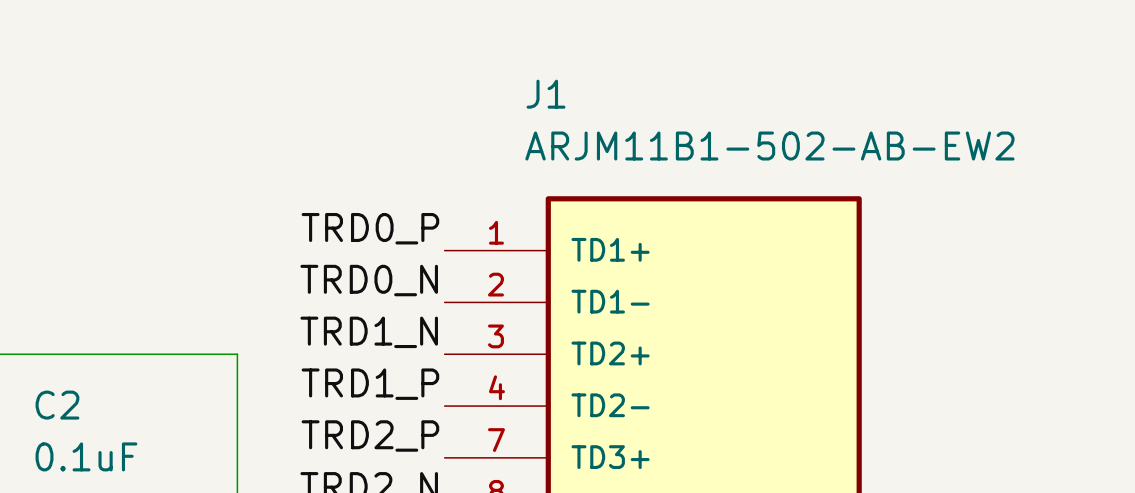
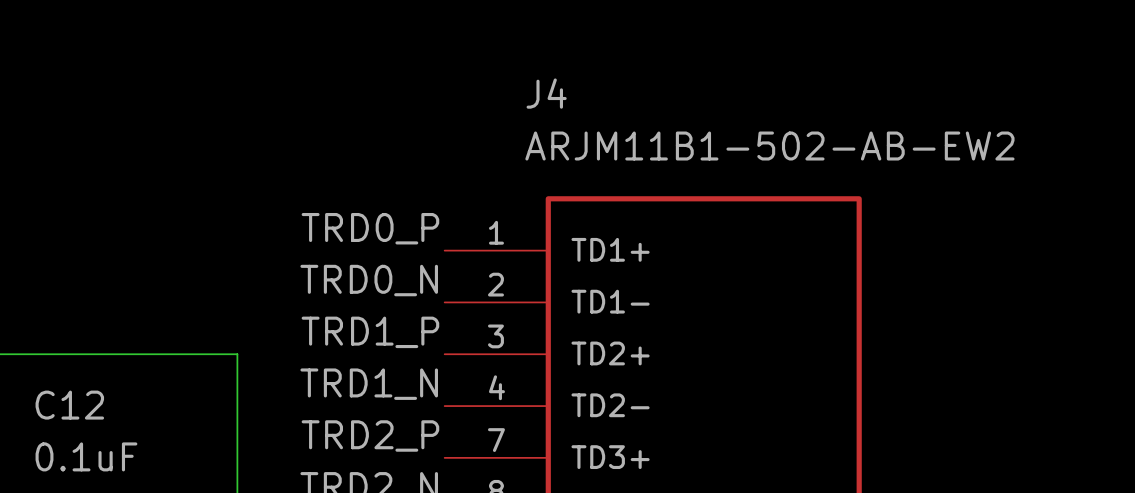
J1 name: J1 (546, 94) -> J4 (546, 93)
label: TRD1_N (369, 332) -> TRD1_P (370, 332)
label: TRD1_P (370, 384) -> TRD1_N (369, 384)
C2 name: C2 (57, 405) -> C12 (69, 405)

